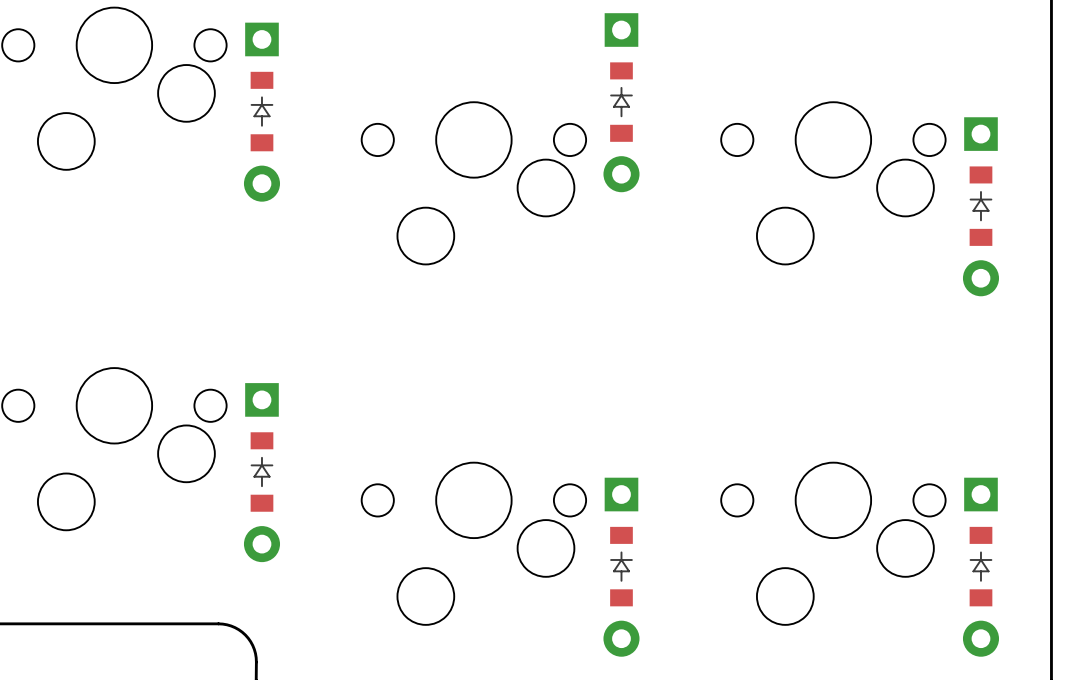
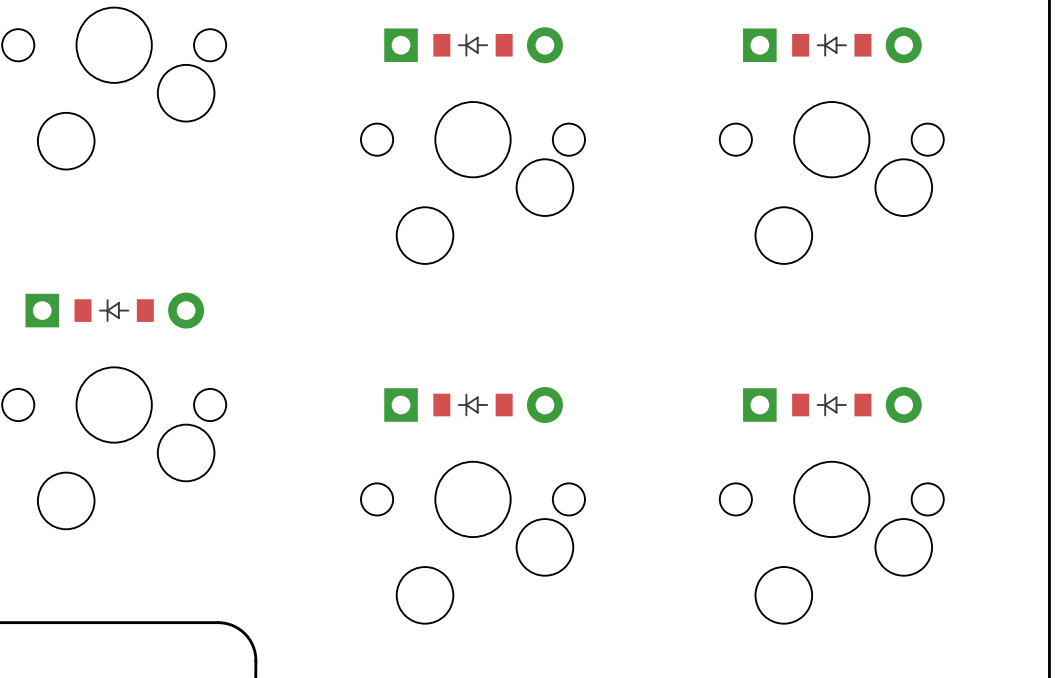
part: none -> (473, 45)
part: none -> (832, 45)
part: (621, 102) -> none
part: (261, 112) -> none
part: (980, 206) -> none
part: none -> (114, 310)
part: none -> (473, 405)
part: none -> (832, 405)
part: (261, 472) -> none
part: (621, 567) -> none
part: (980, 567) -> none

